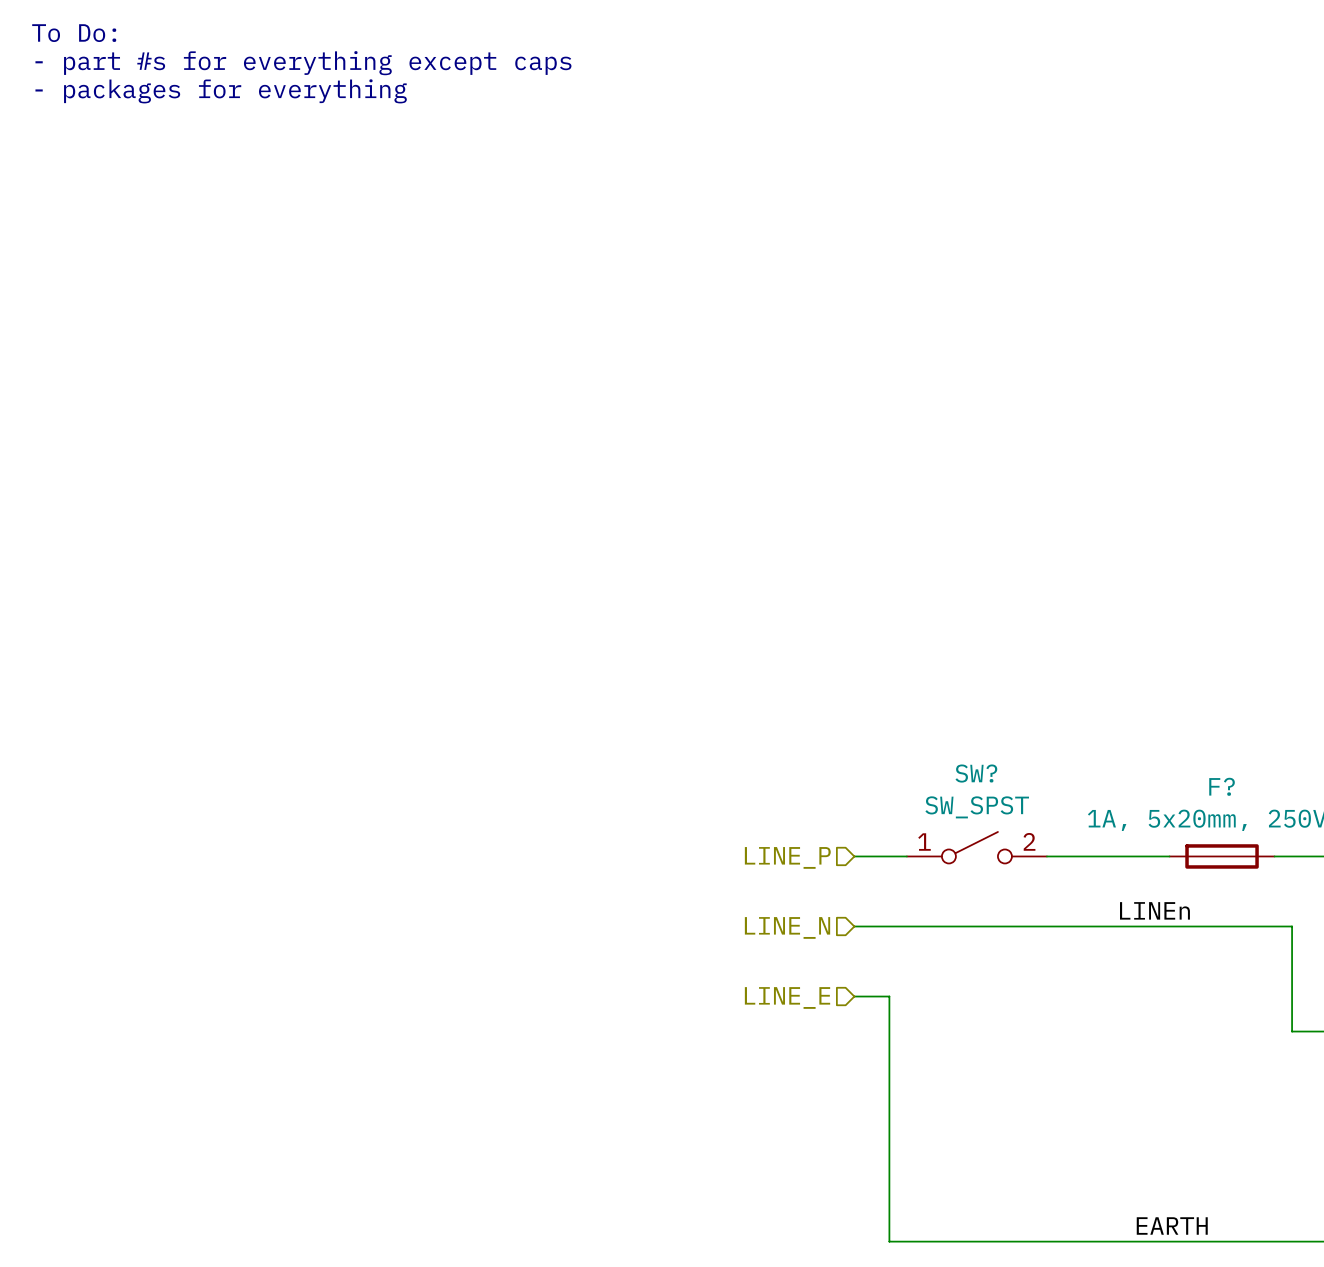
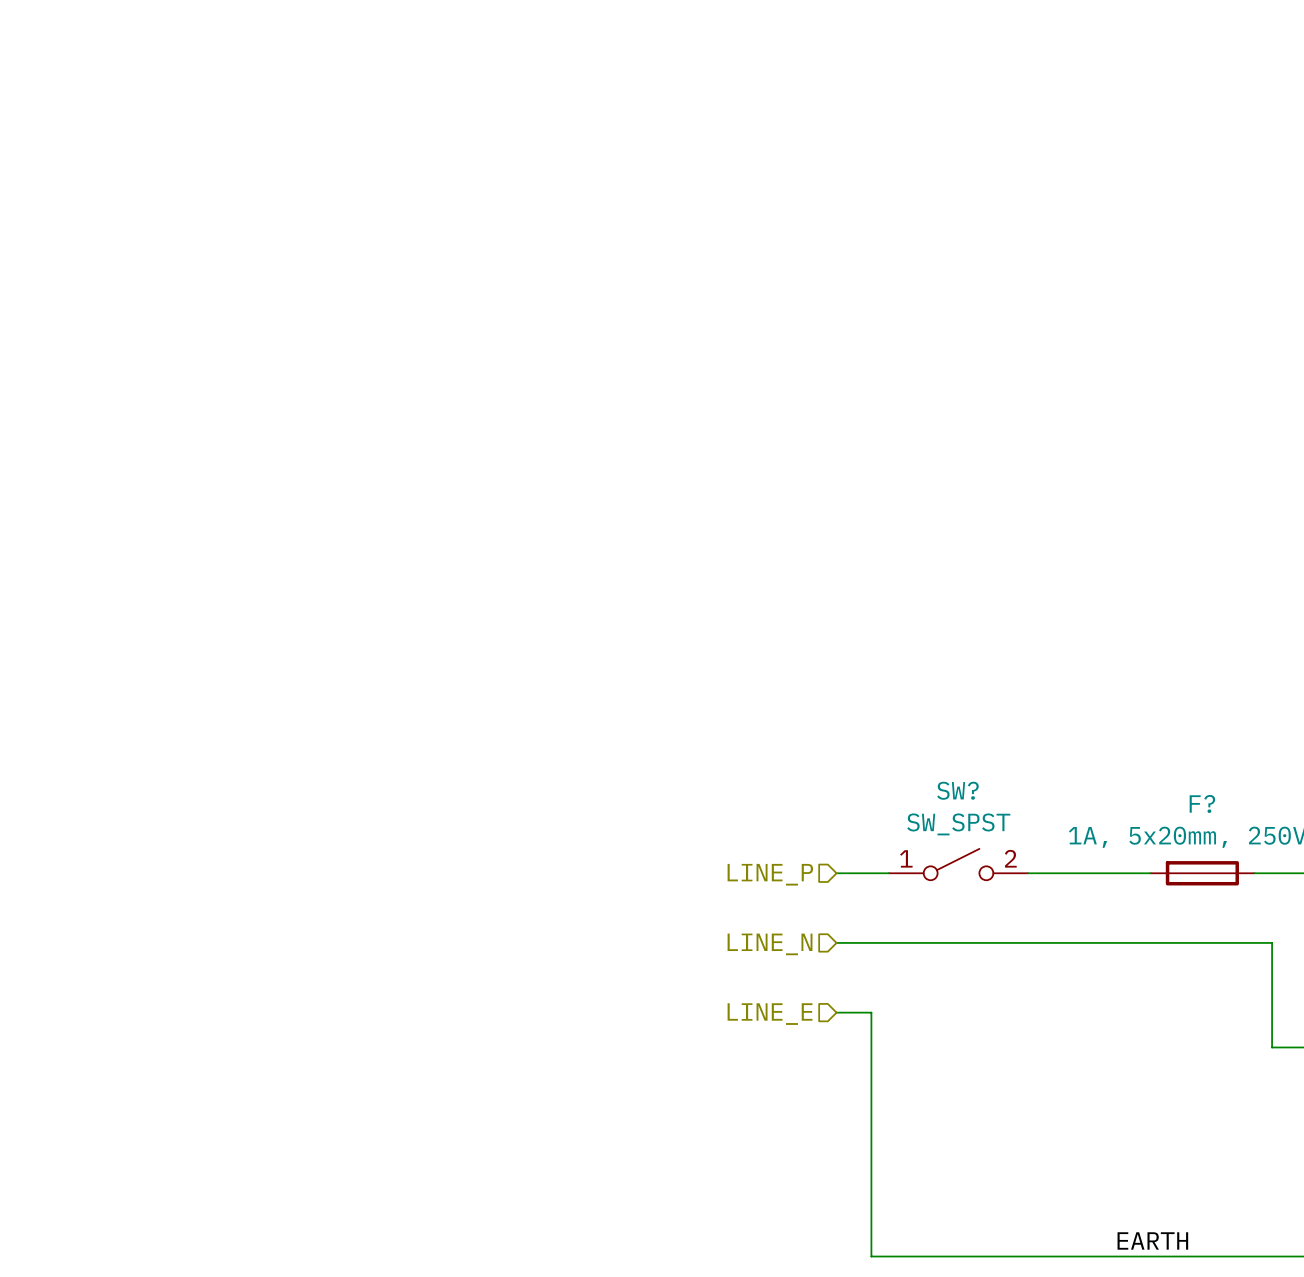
text: To Do: (74, 33) -> none
text: - part #s for everything except caps (303, 63) -> none
text: - packages for everything (221, 91) -> none
label: LINEn (1154, 910) -> none

